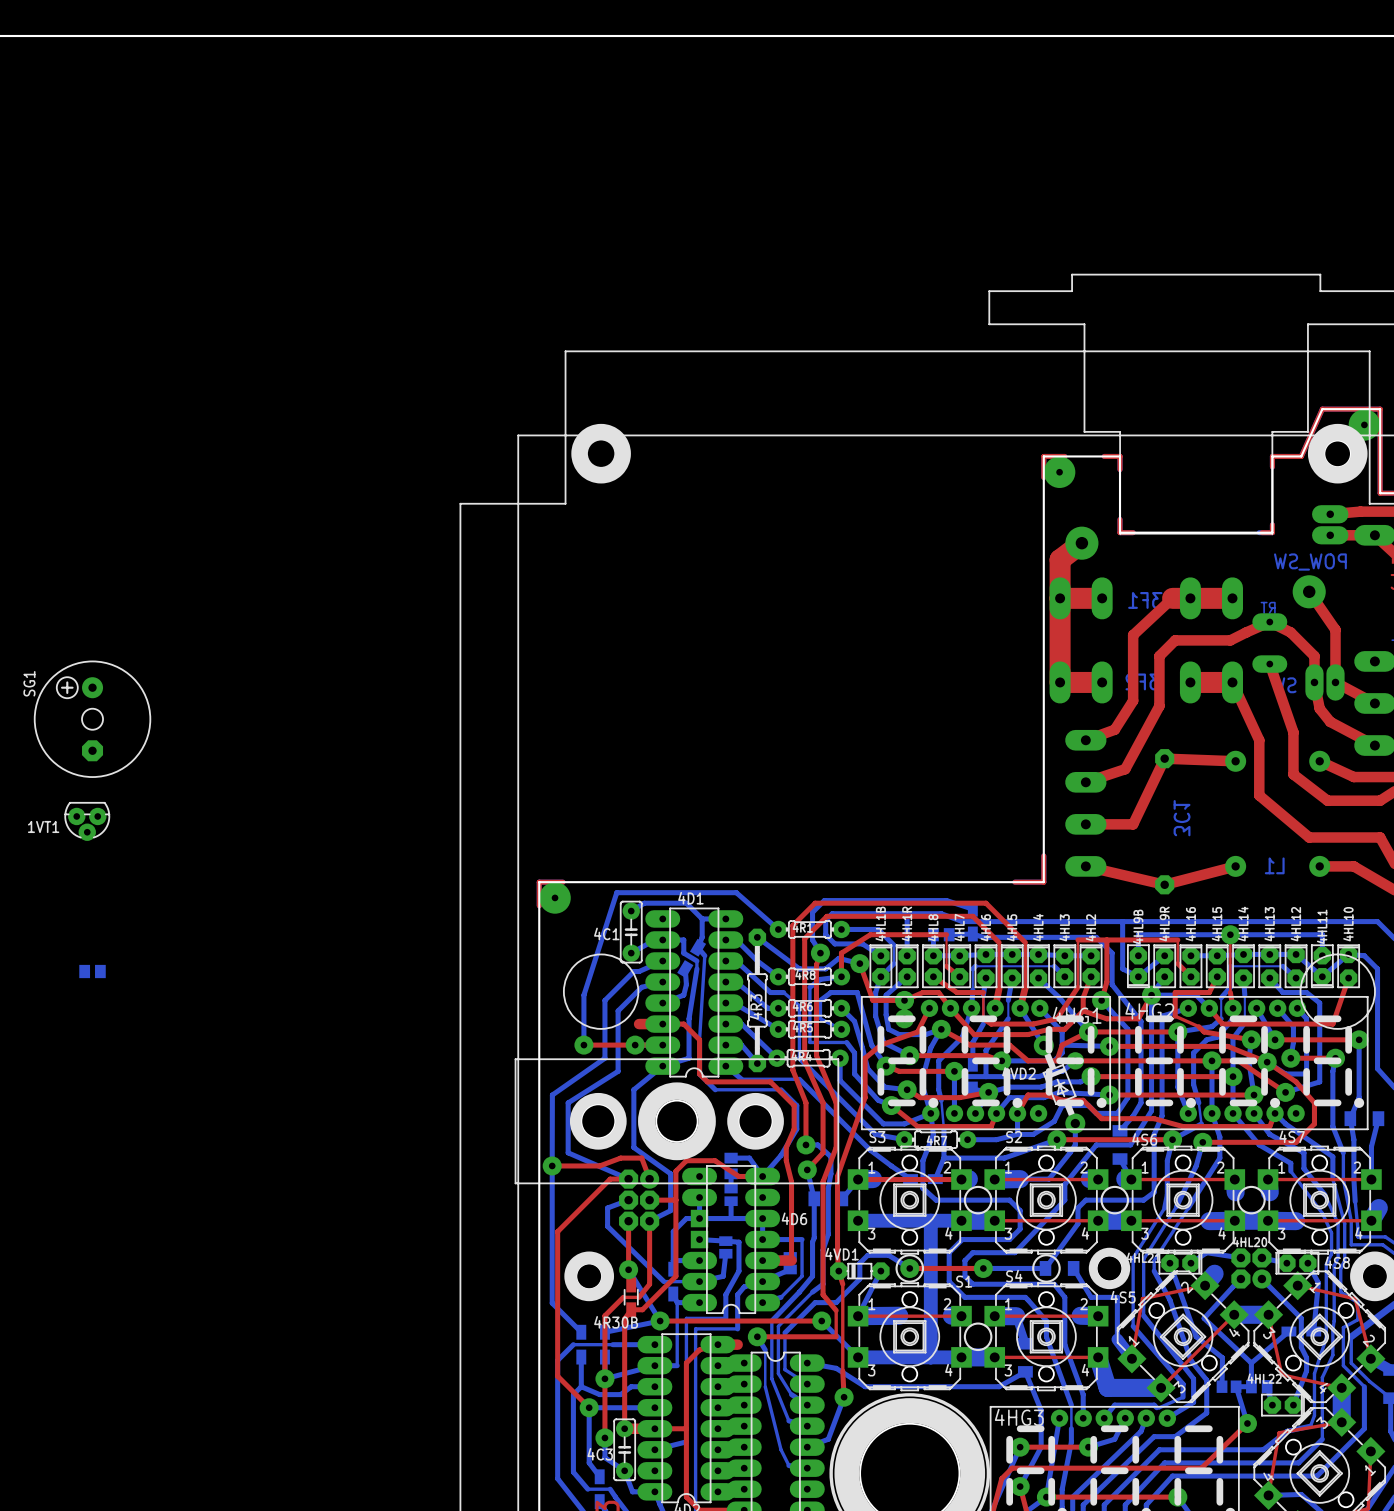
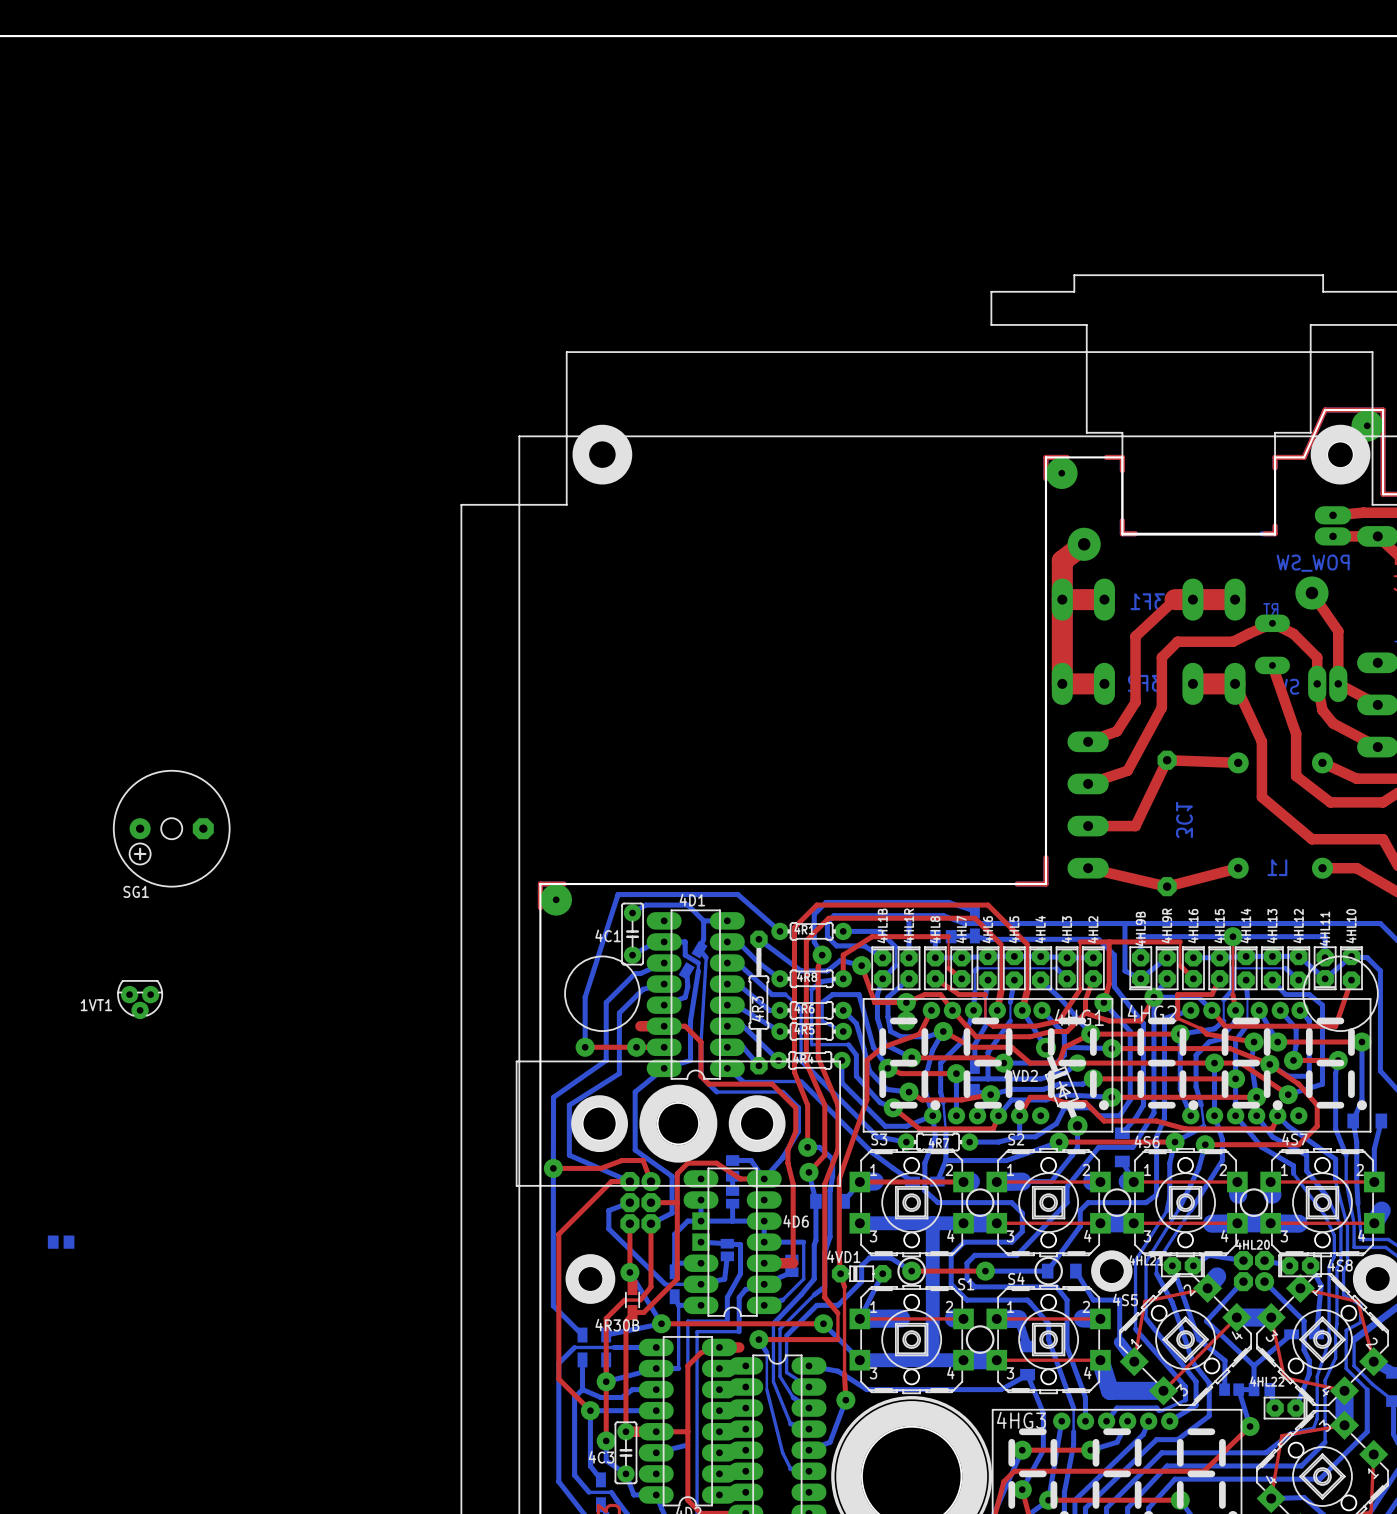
SG1 rotation: 0° (92, 719) -> 90° counterclockwise (171, 828)
SG1 position: (92, 719) -> (171, 828)
1VT1 position: (87, 821) -> (140, 999)
part: (92, 971) -> none
part: none -> (61, 1242)

